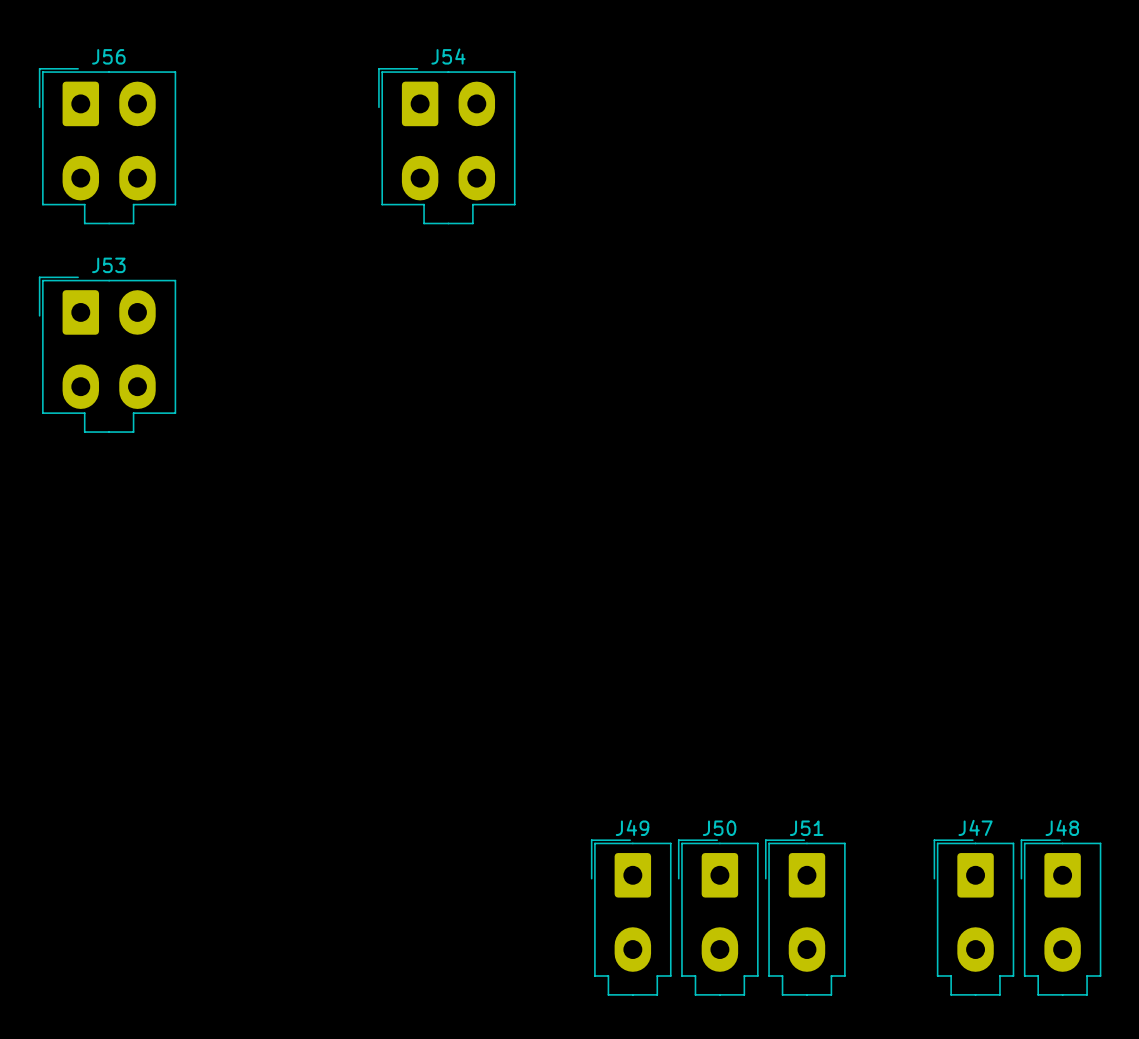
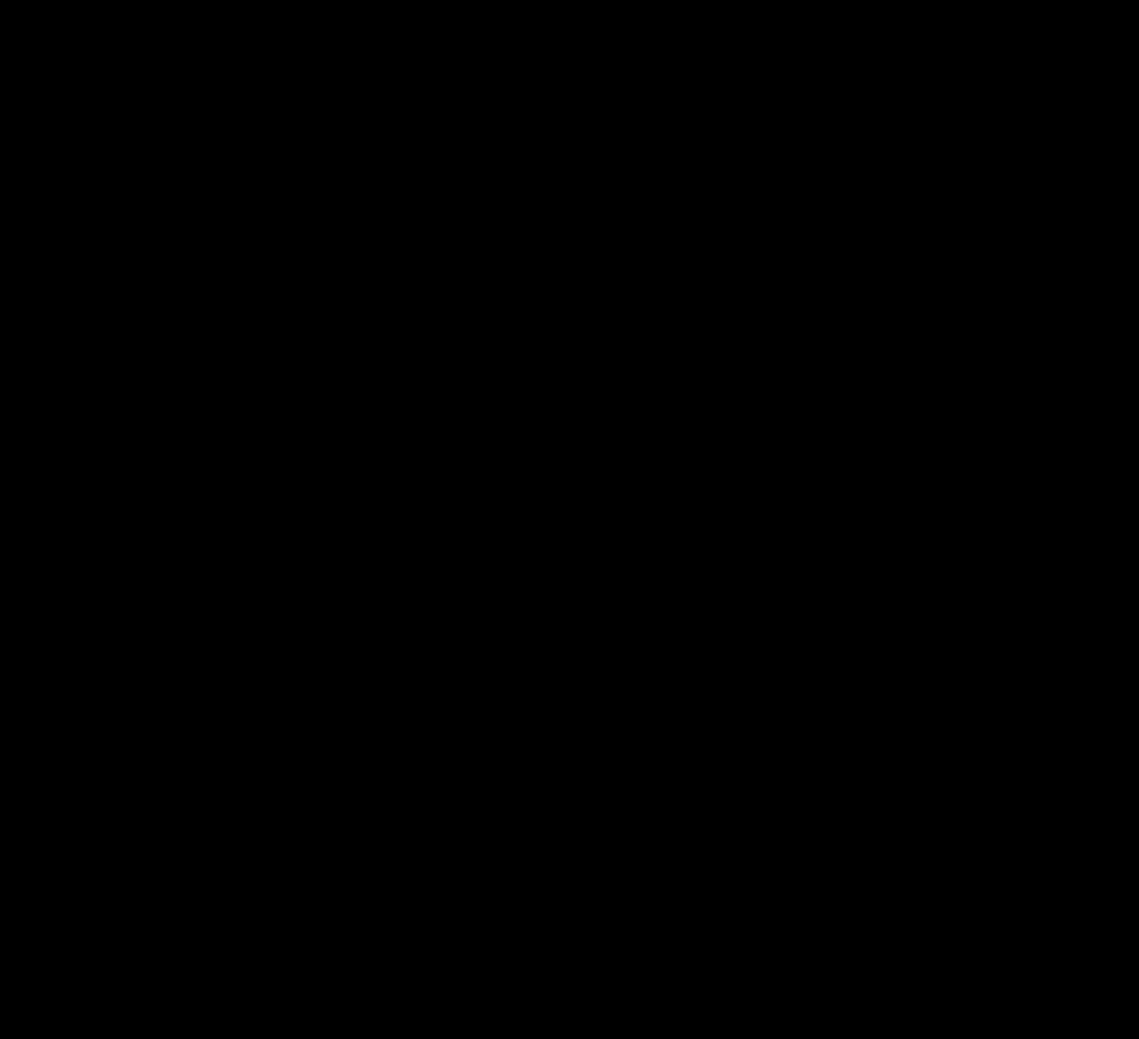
J56: (107, 146) -> none
J54: (446, 146) -> none
J53: (107, 354) -> none
J49: (631, 917) -> none
J50: (718, 917) -> none
J51: (805, 917) -> none
J47: (973, 917) -> none
J48: (1060, 917) -> none

